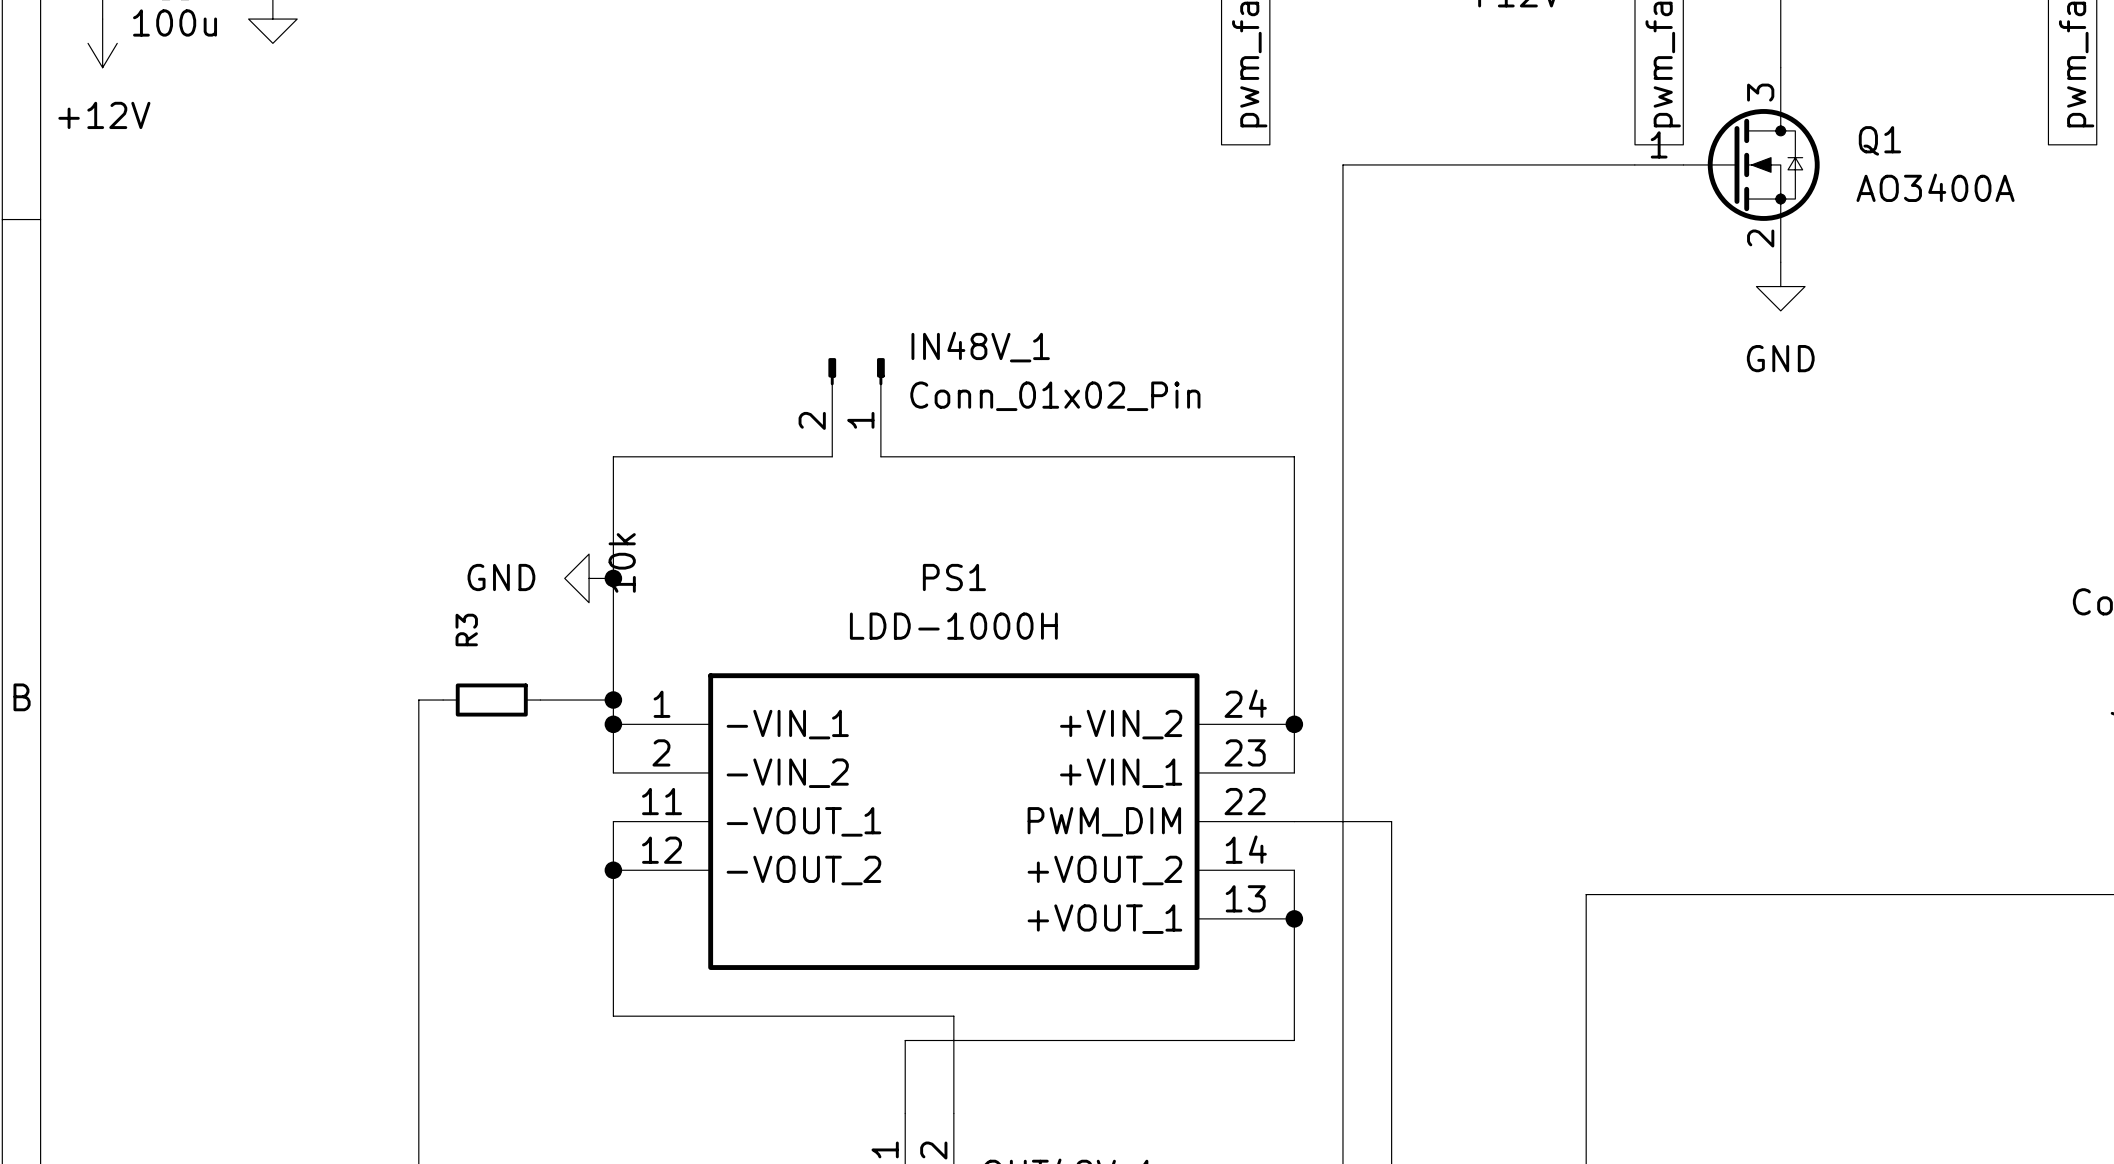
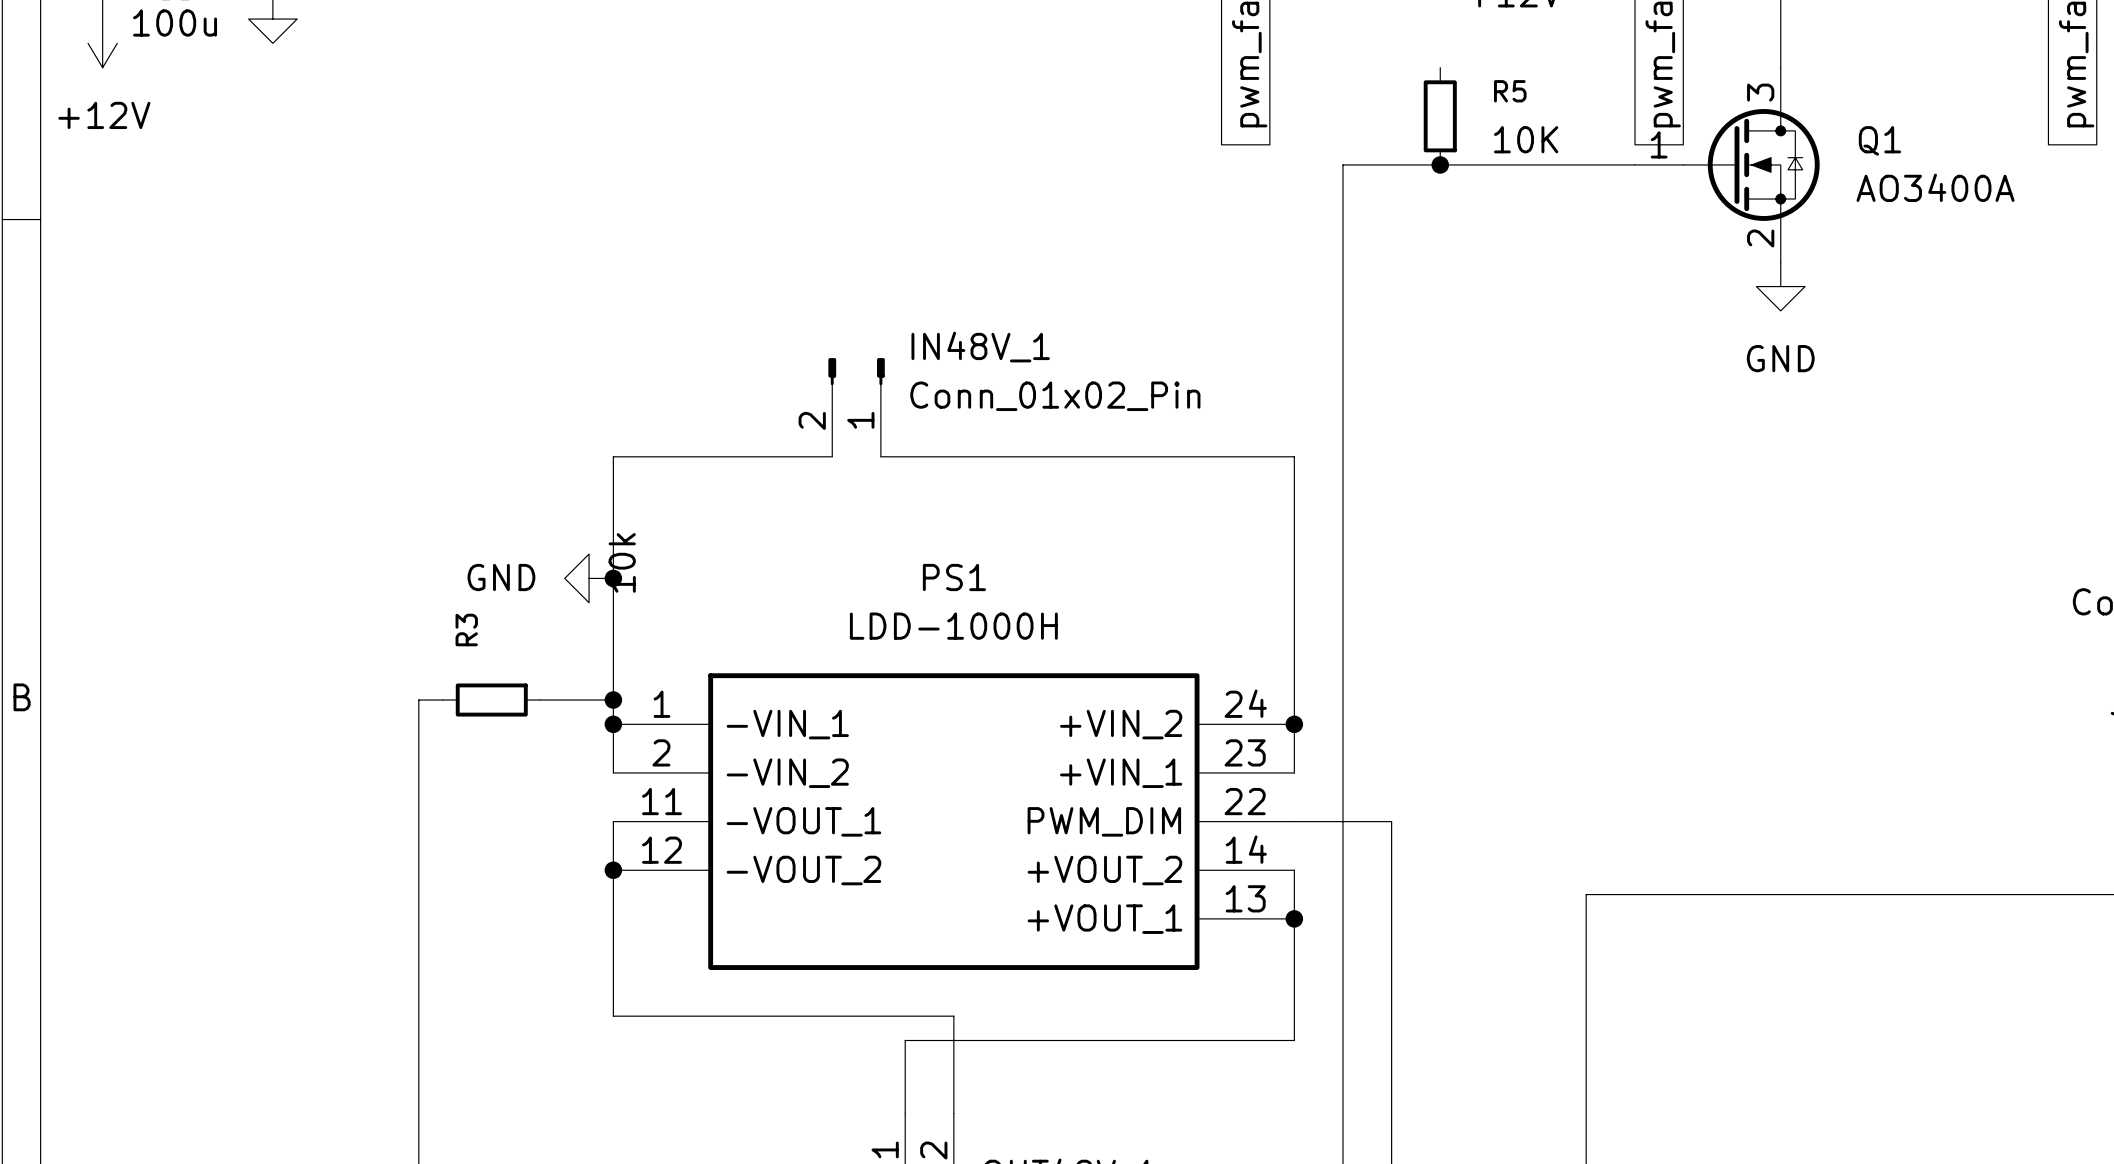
R5: none -> 10K (1440, 116)
junction: none -> (1440, 164)

